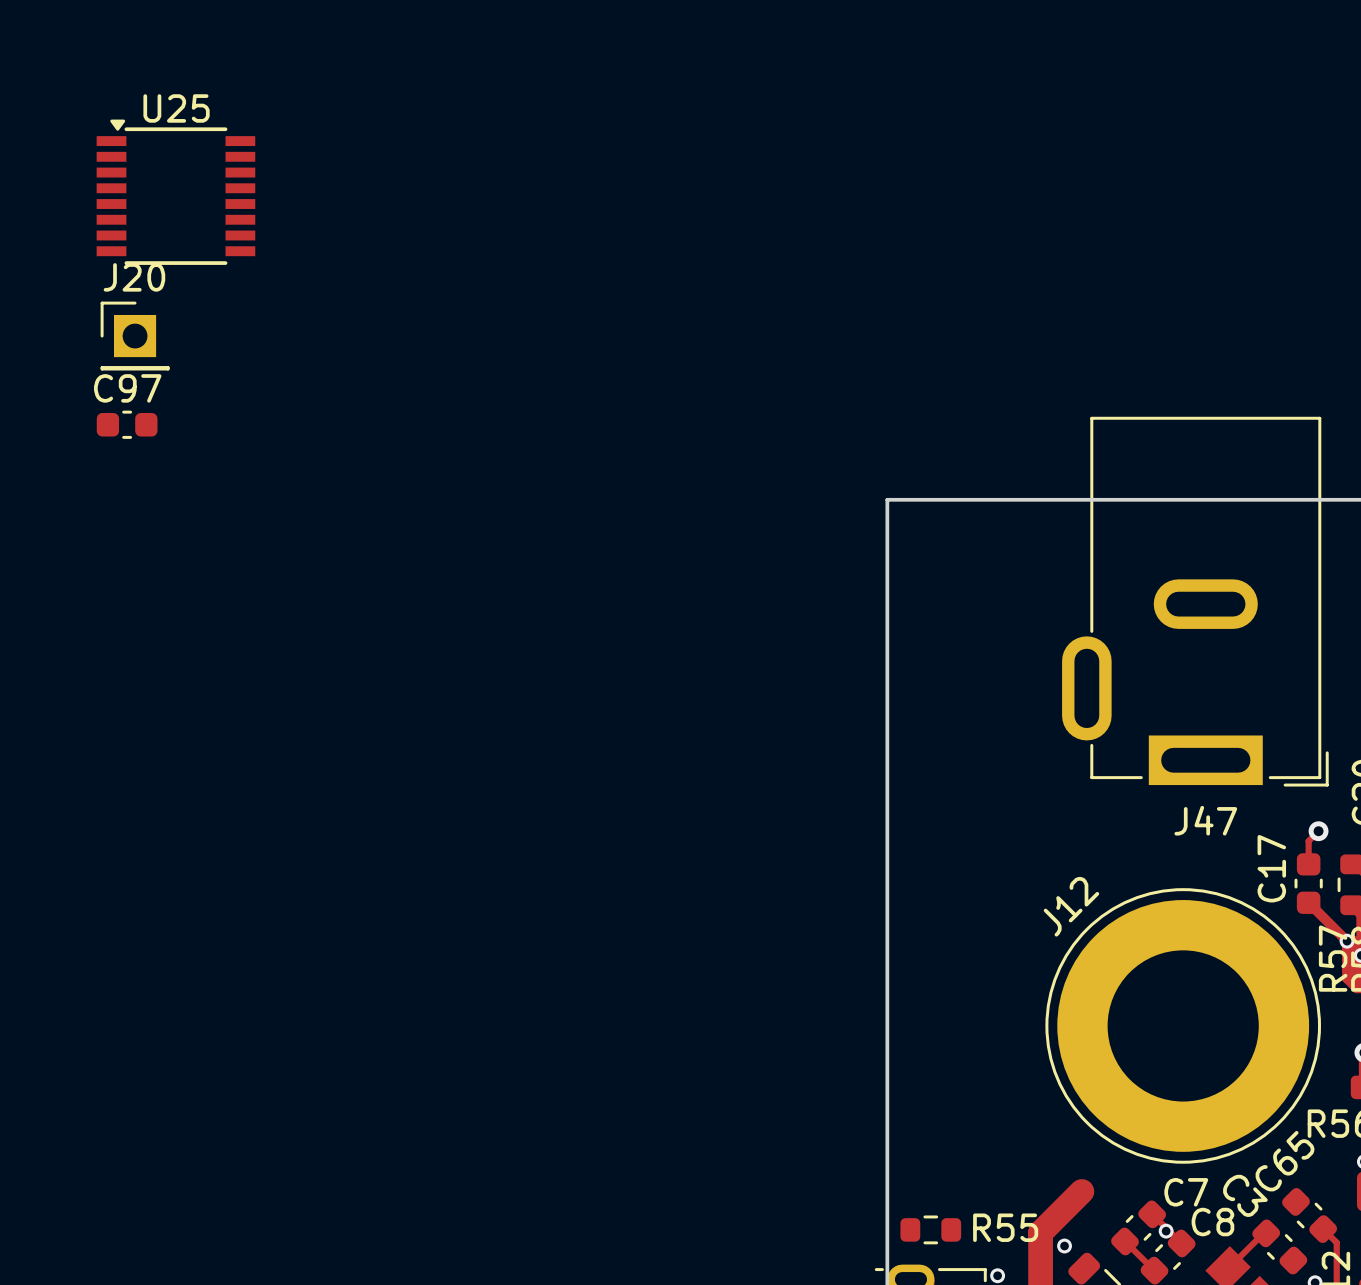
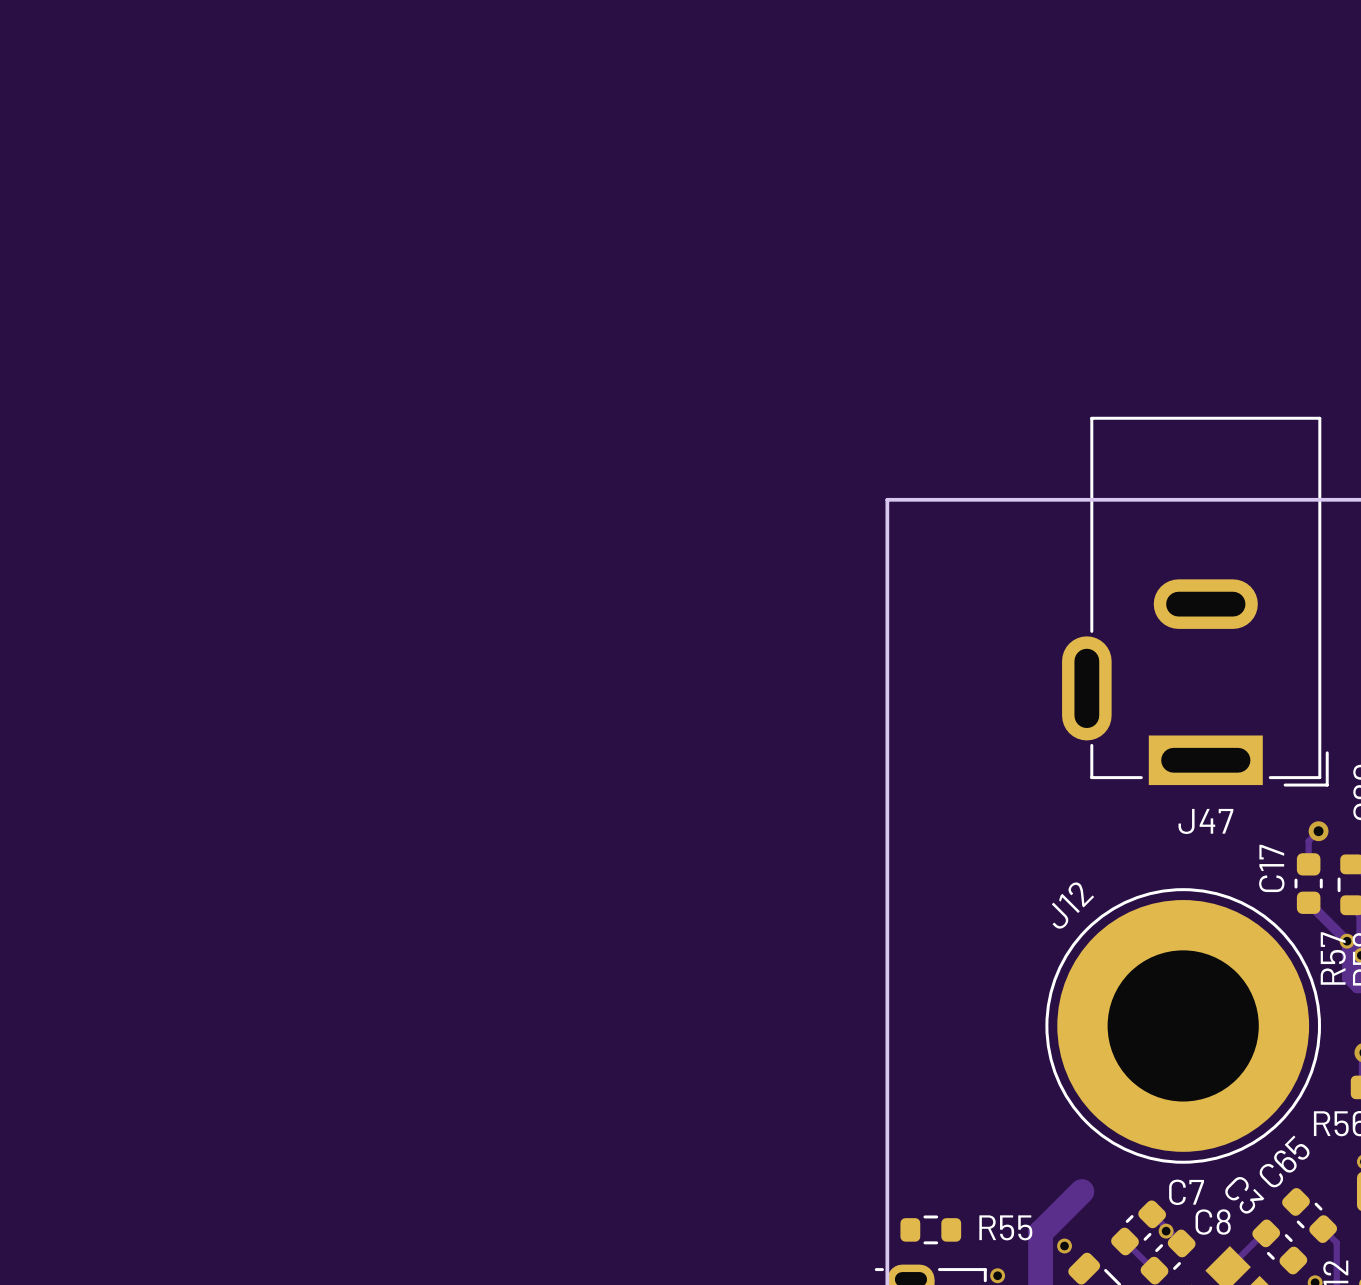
U25: (175, 192) -> none
J20: (135, 336) -> none
C97: (127, 424) -> none

